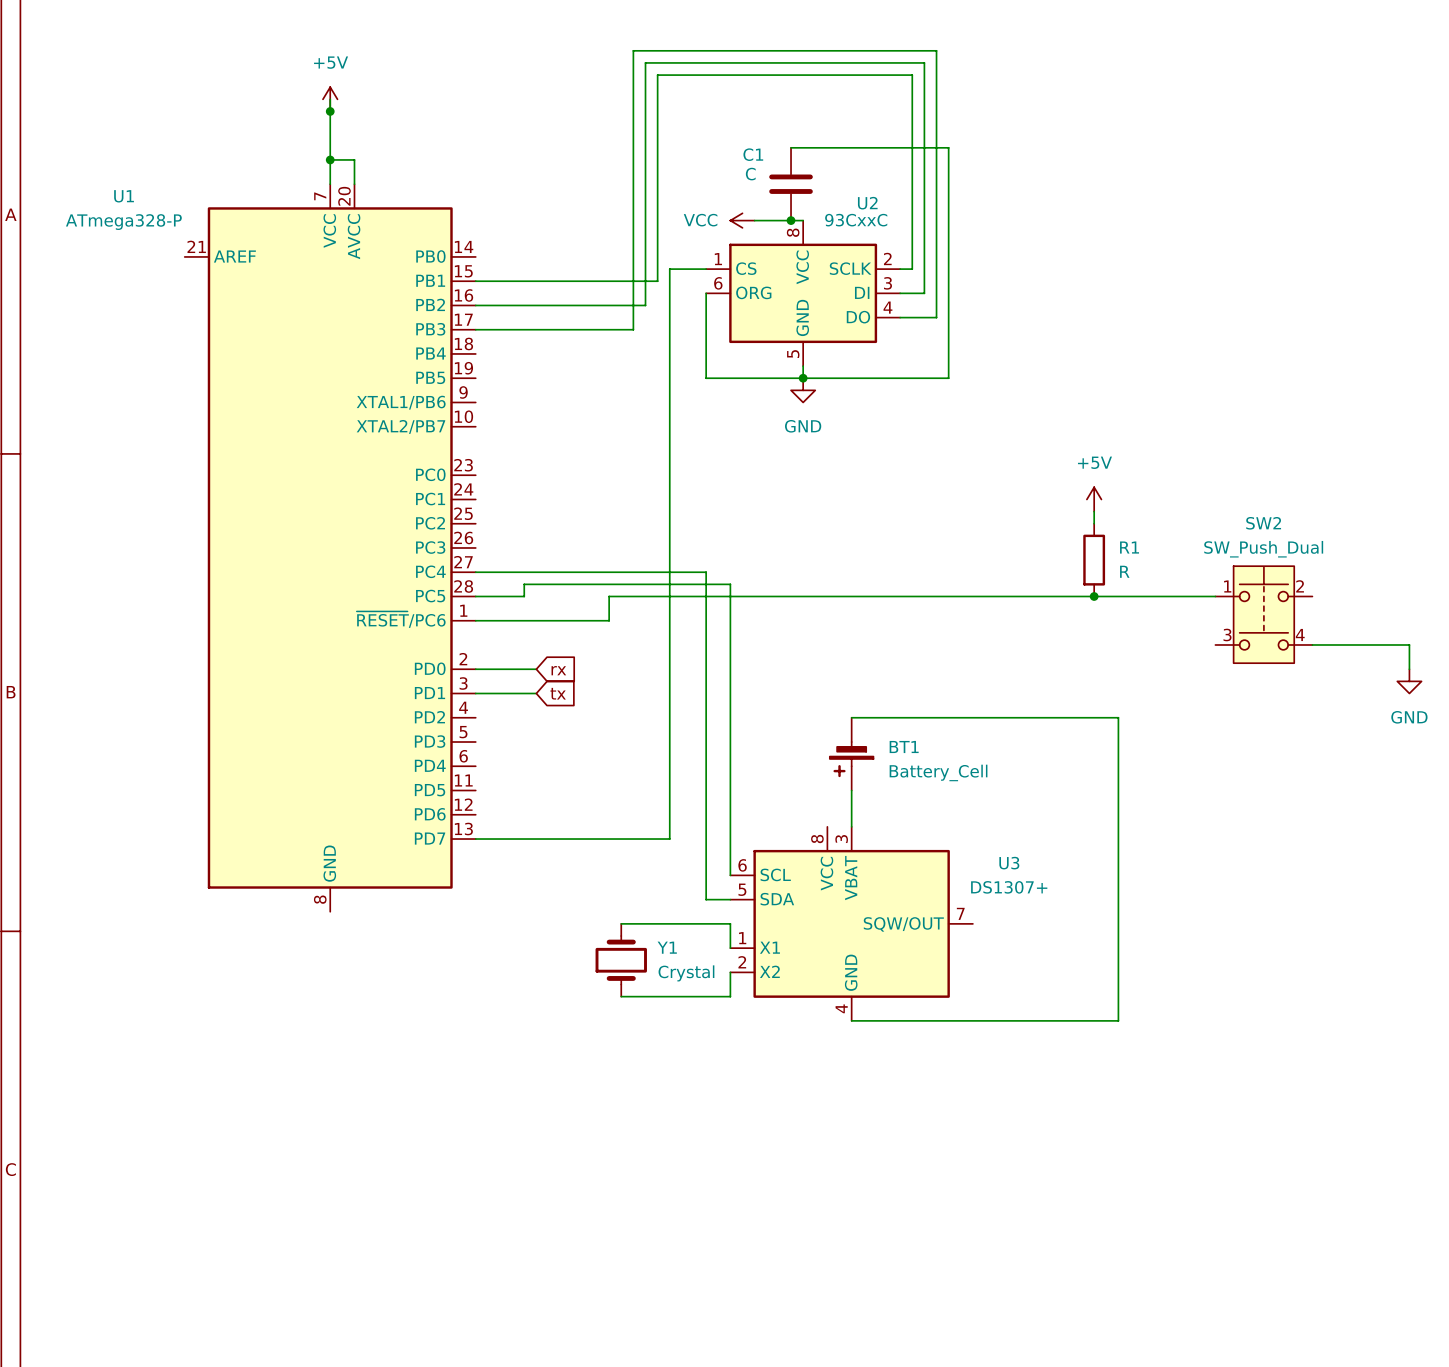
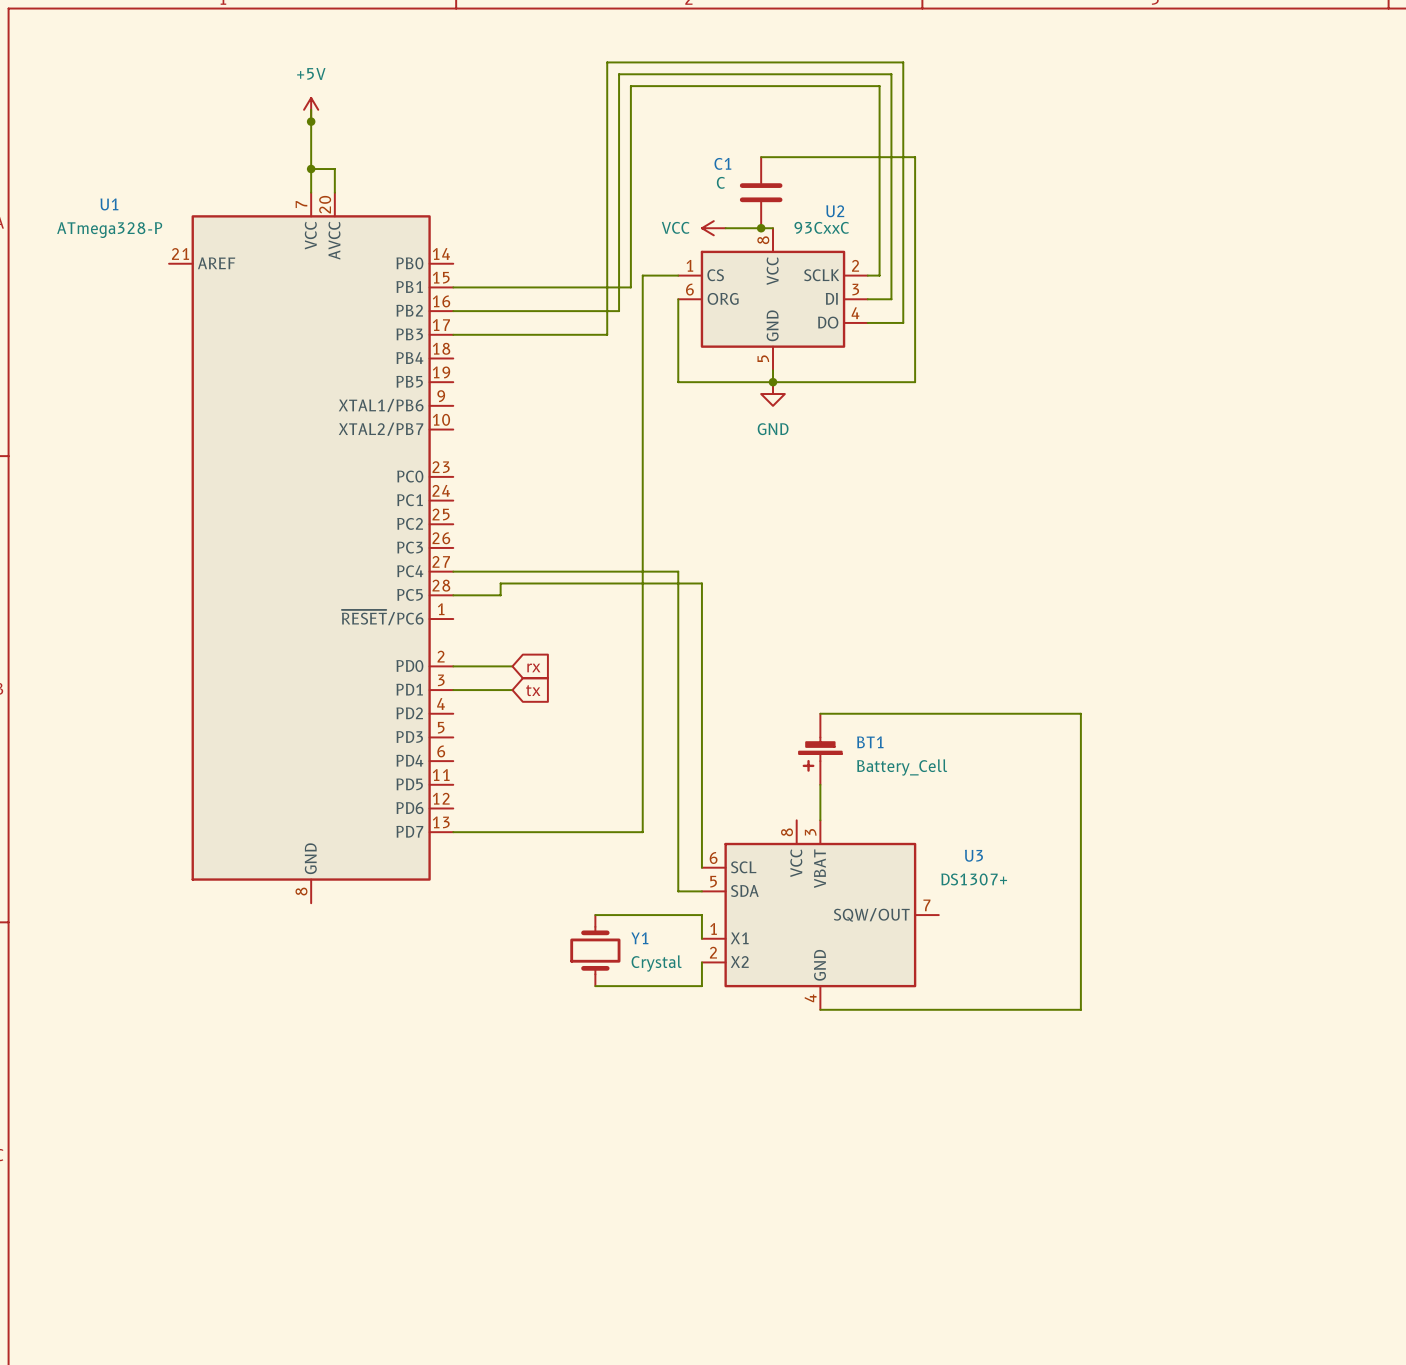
power symbol: +5V (1094, 499) -> none
wire: (1094, 511) (1094, 523) -> none
R1: R (1094, 560) -> none
junction: (1094, 596) -> none
wire: (1215, 596) (609, 596) (609, 620) (475, 620) -> none
SW2: SW_Push_Dual (1263, 614) -> none
wire: (1312, 644) (1409, 644) (1409, 669) -> none
power symbol: GND (1409, 681) -> none

